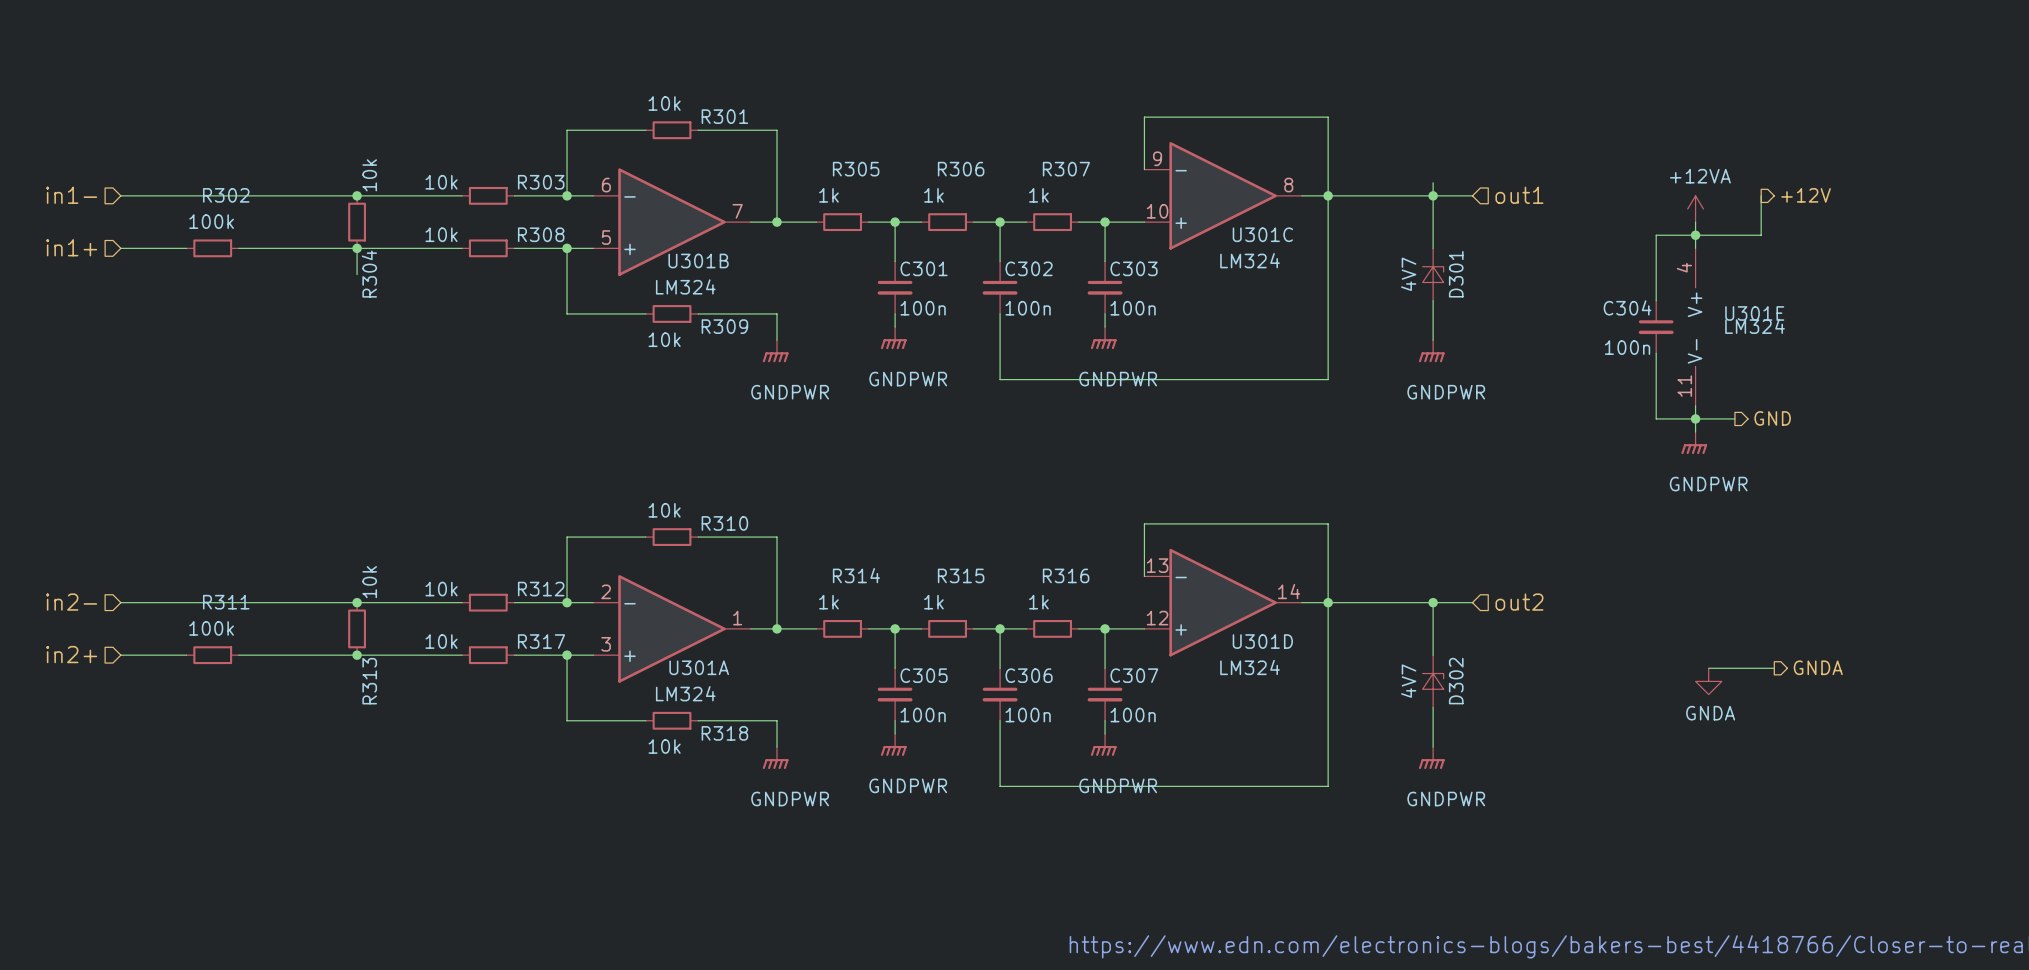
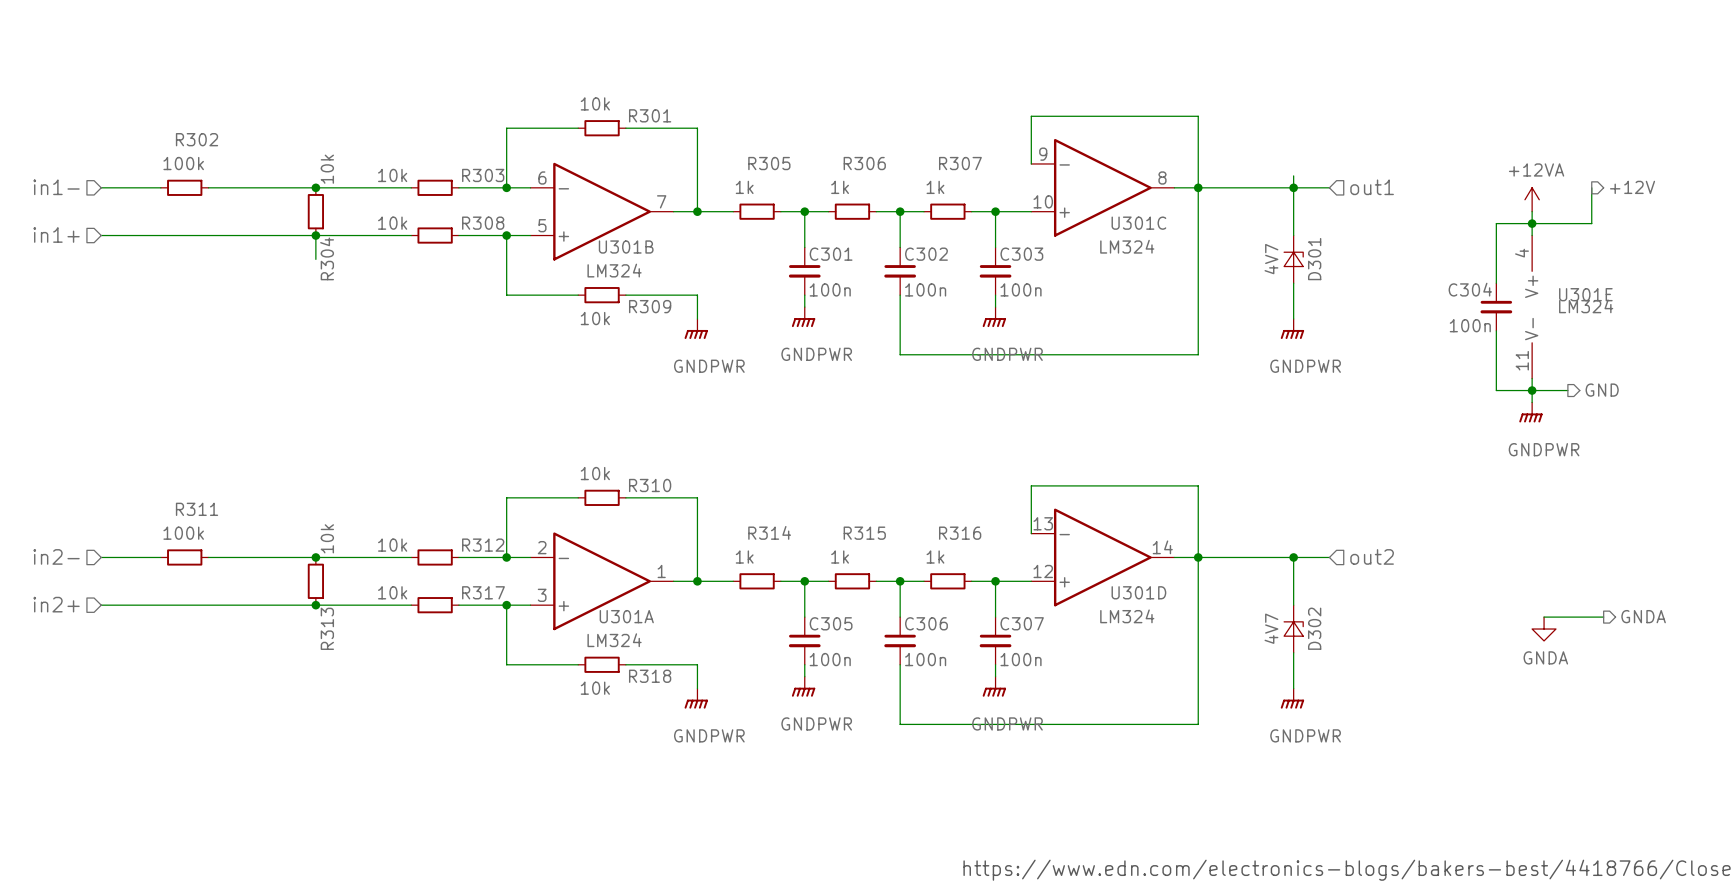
wire: (186, 195) (238, 195) -> (160, 235) (208, 235)
R302 position: (212, 248) -> (184, 187)
wire: (186, 602) (238, 602) -> (160, 605) (208, 605)
R311 position: (212, 655) -> (184, 557)

